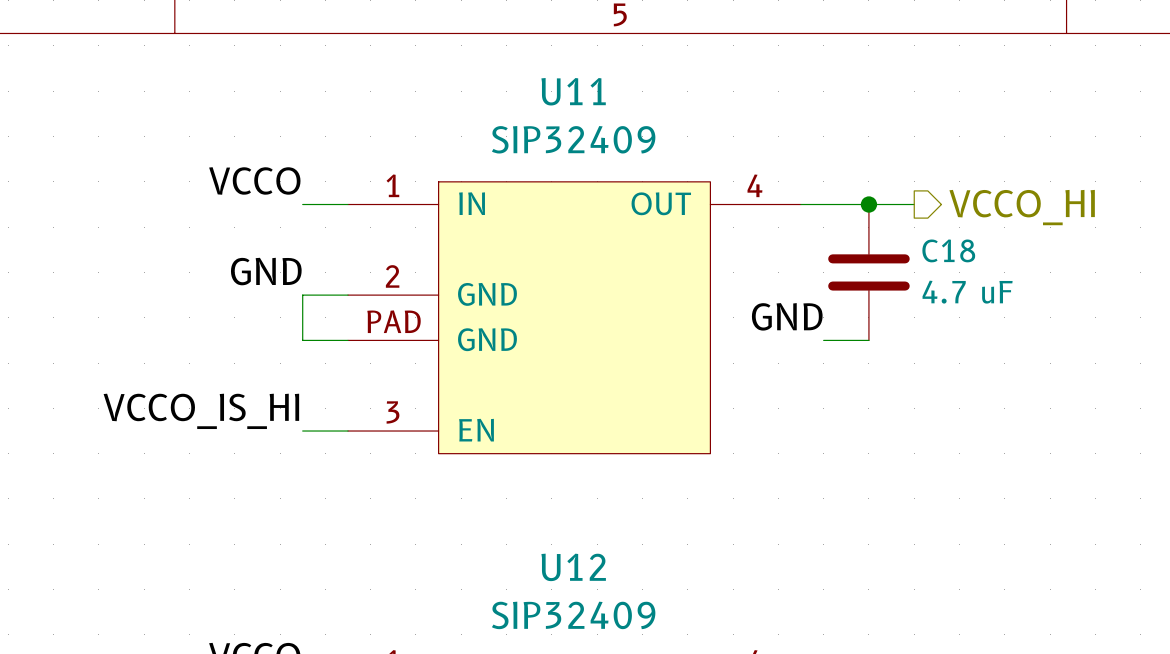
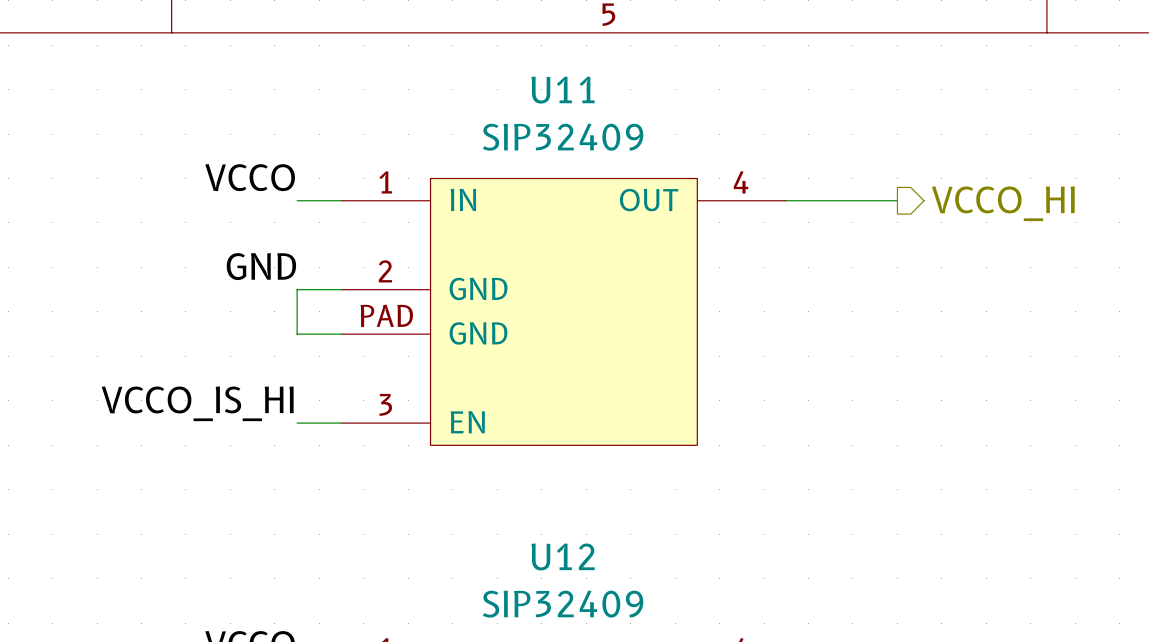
junction: (868, 204) -> none
C18: 4.7 uF (868, 272) -> none
label: GND (787, 316) -> none
wire: (823, 340) (868, 340) -> none

